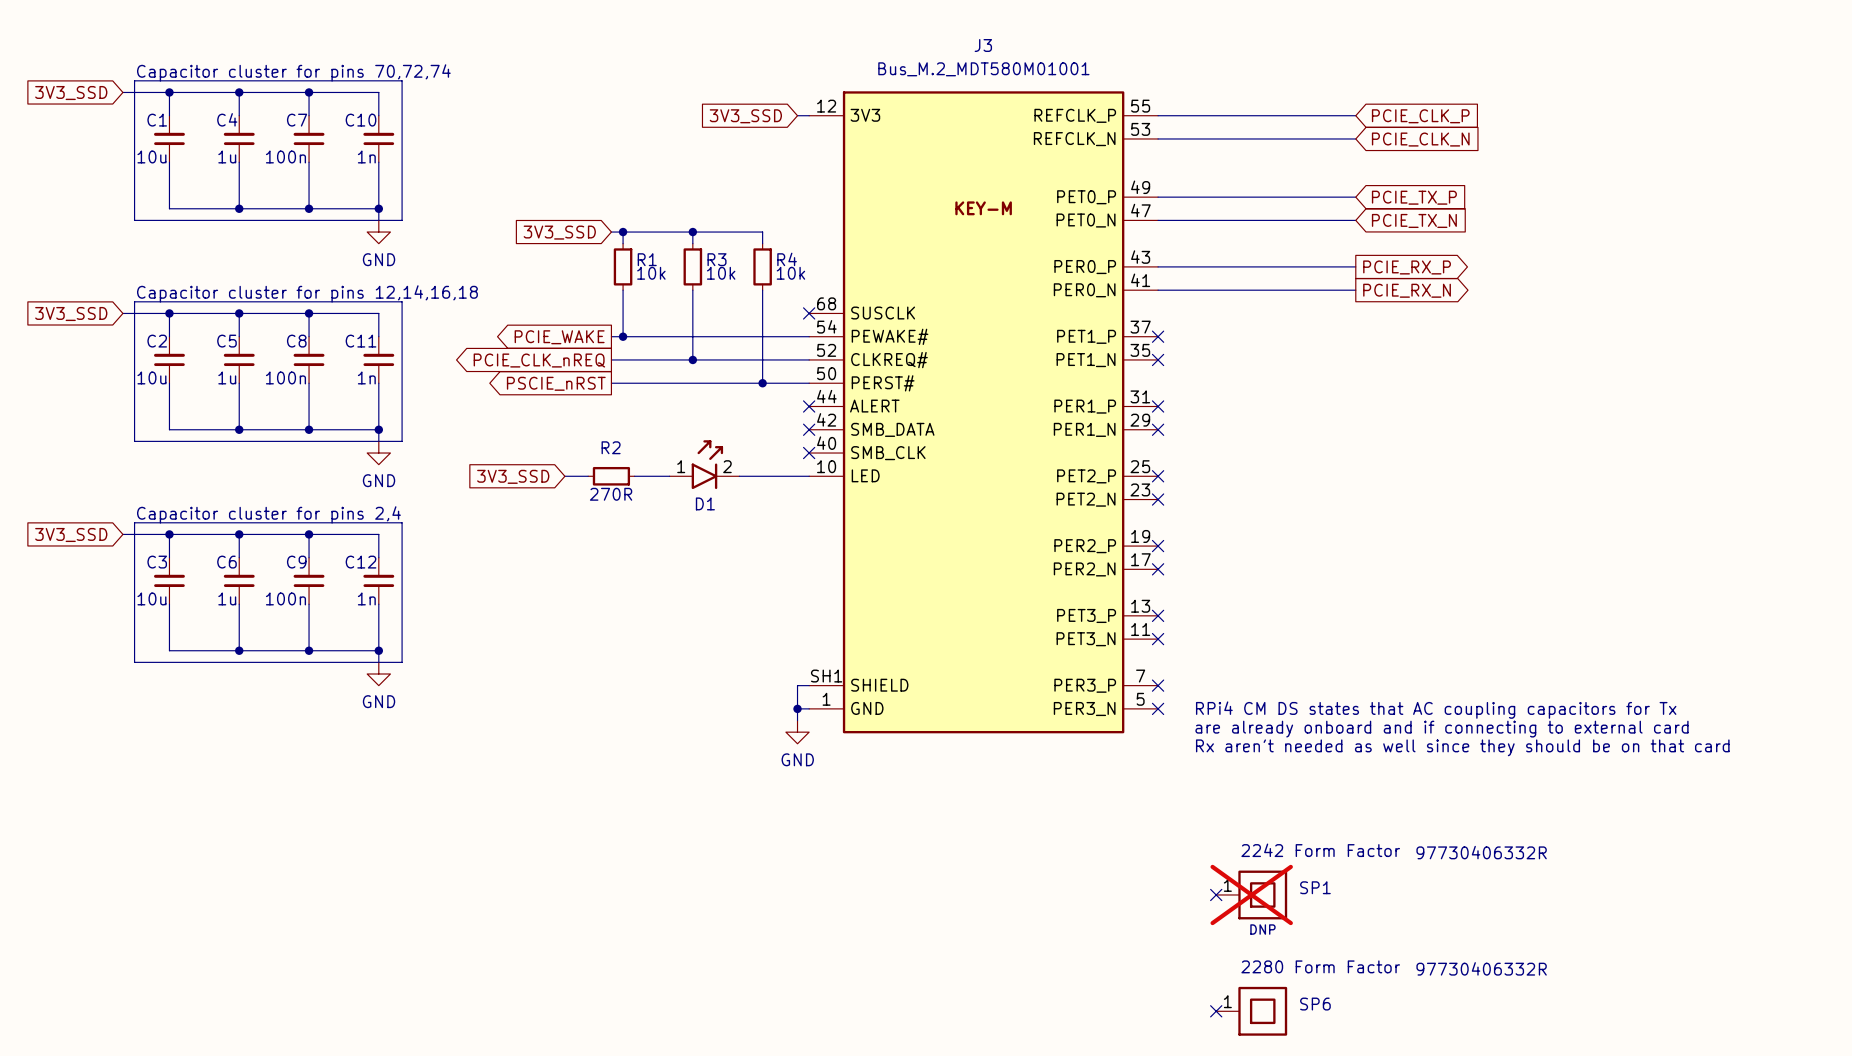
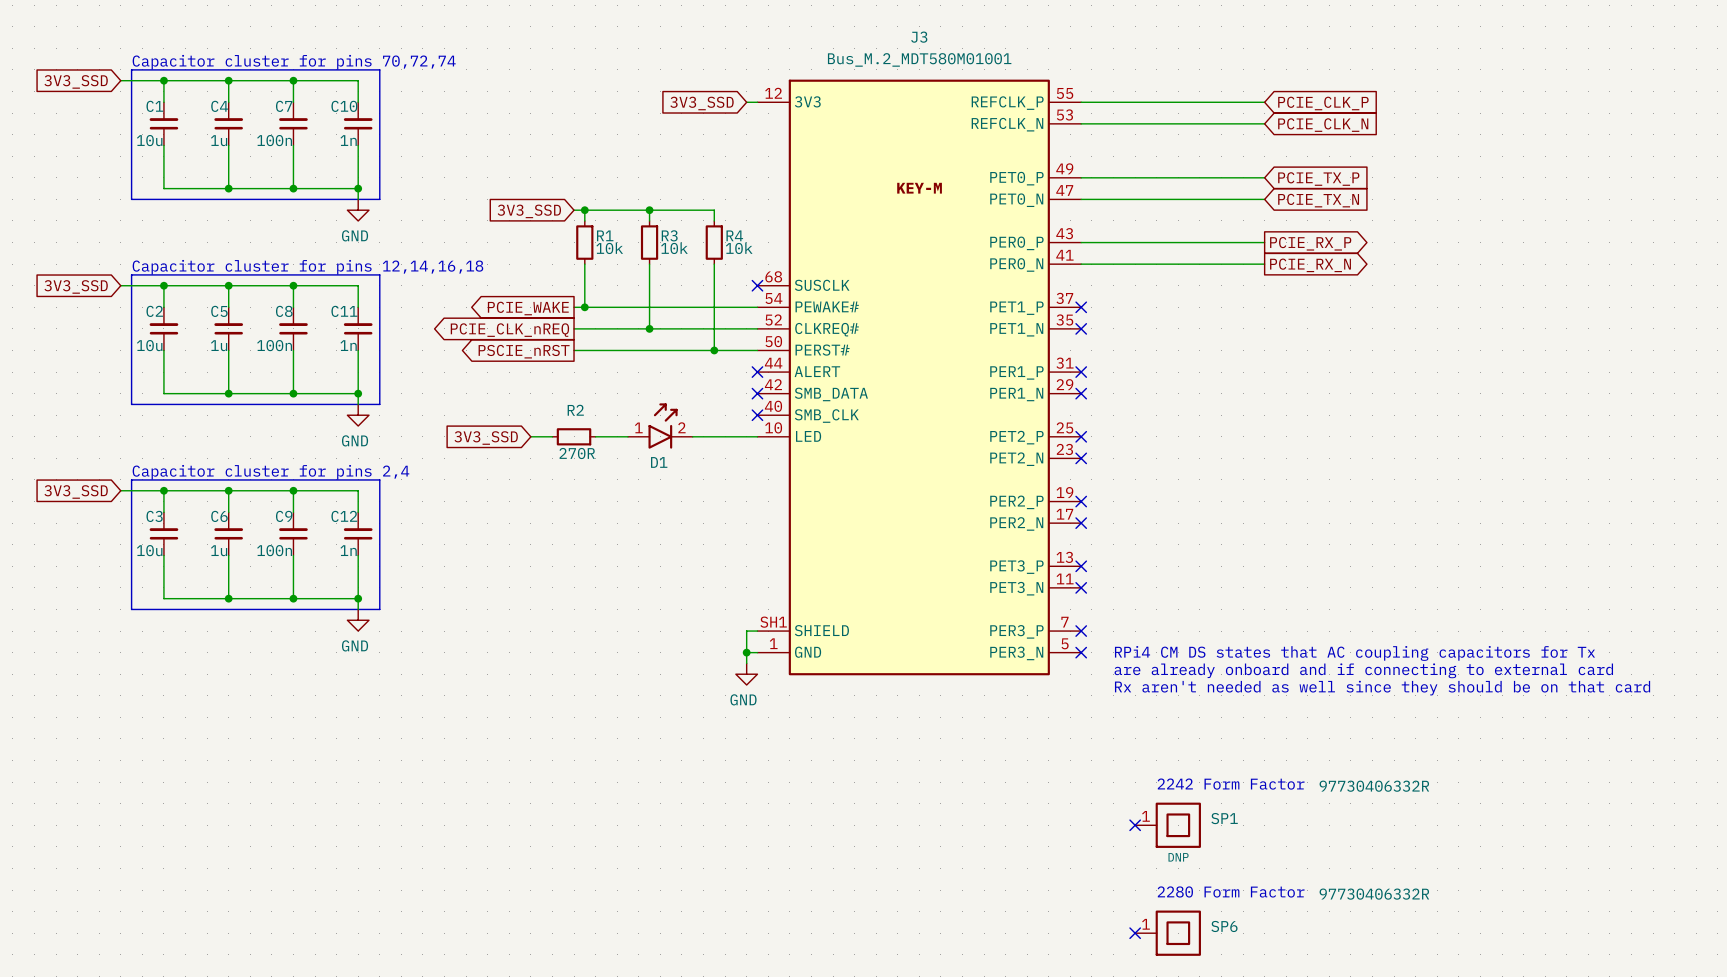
SP1 do-not-place cross: (1251, 894) -> none

